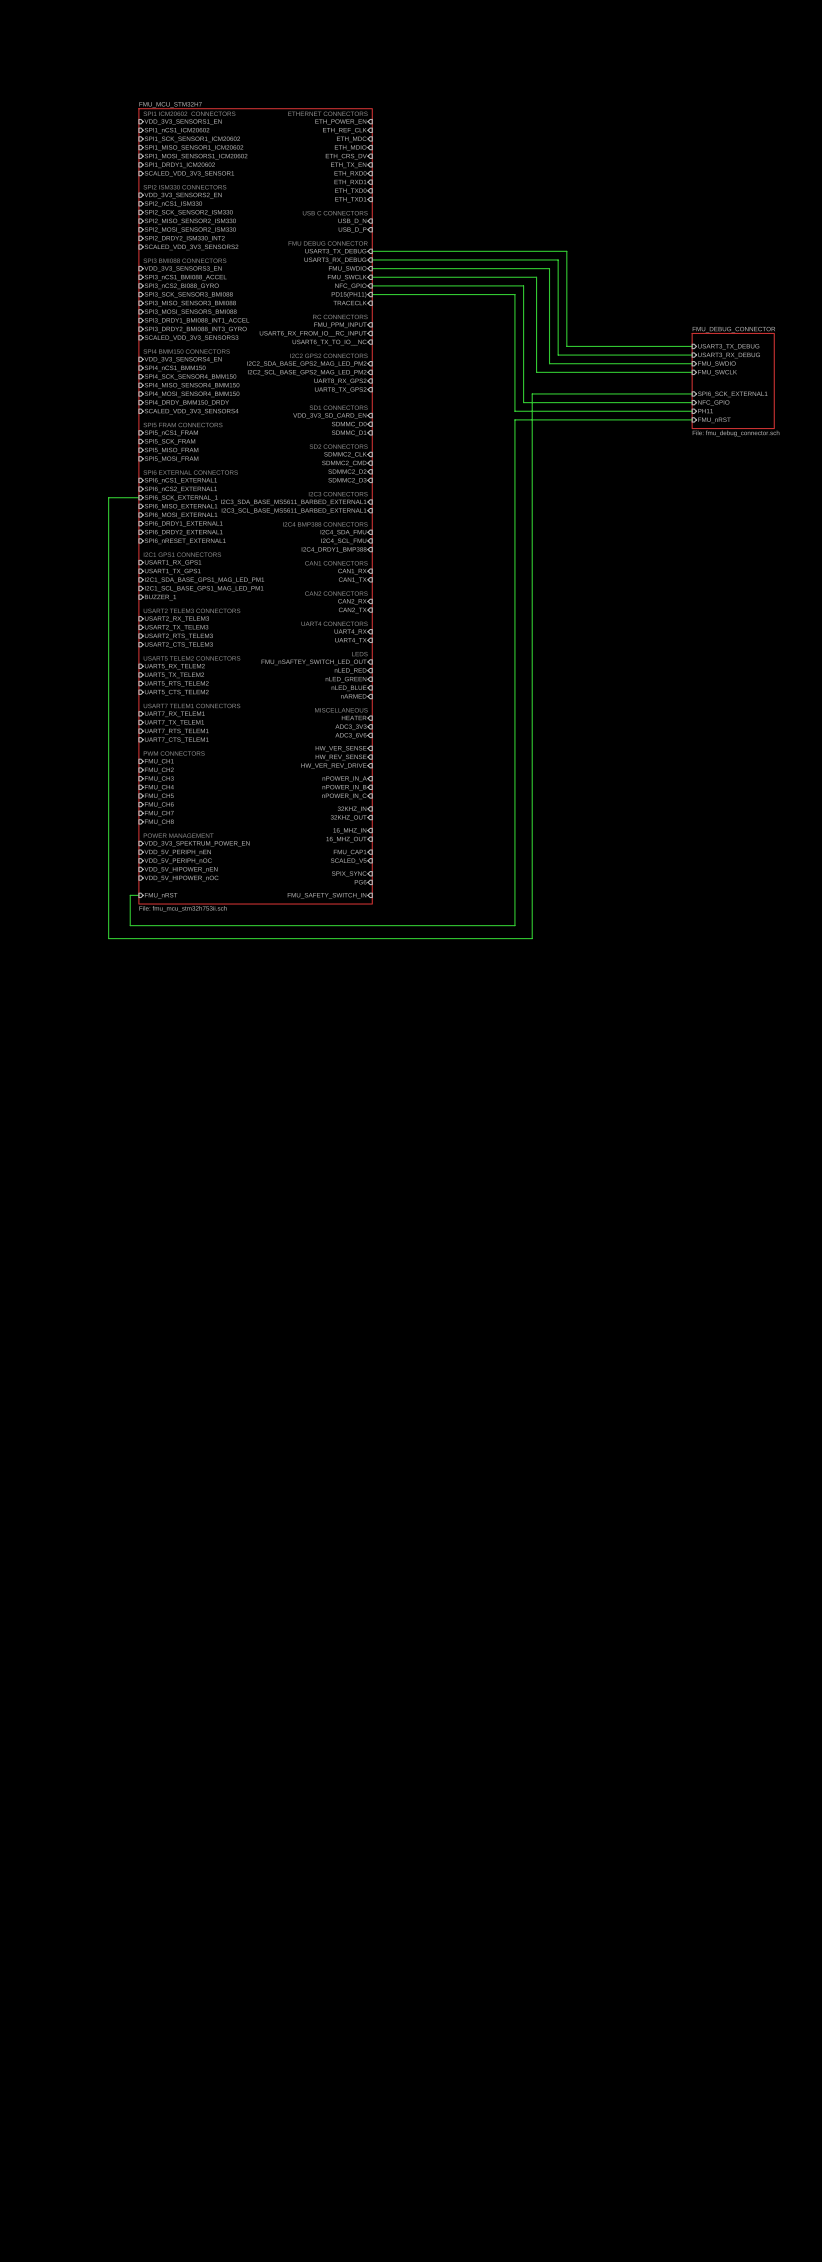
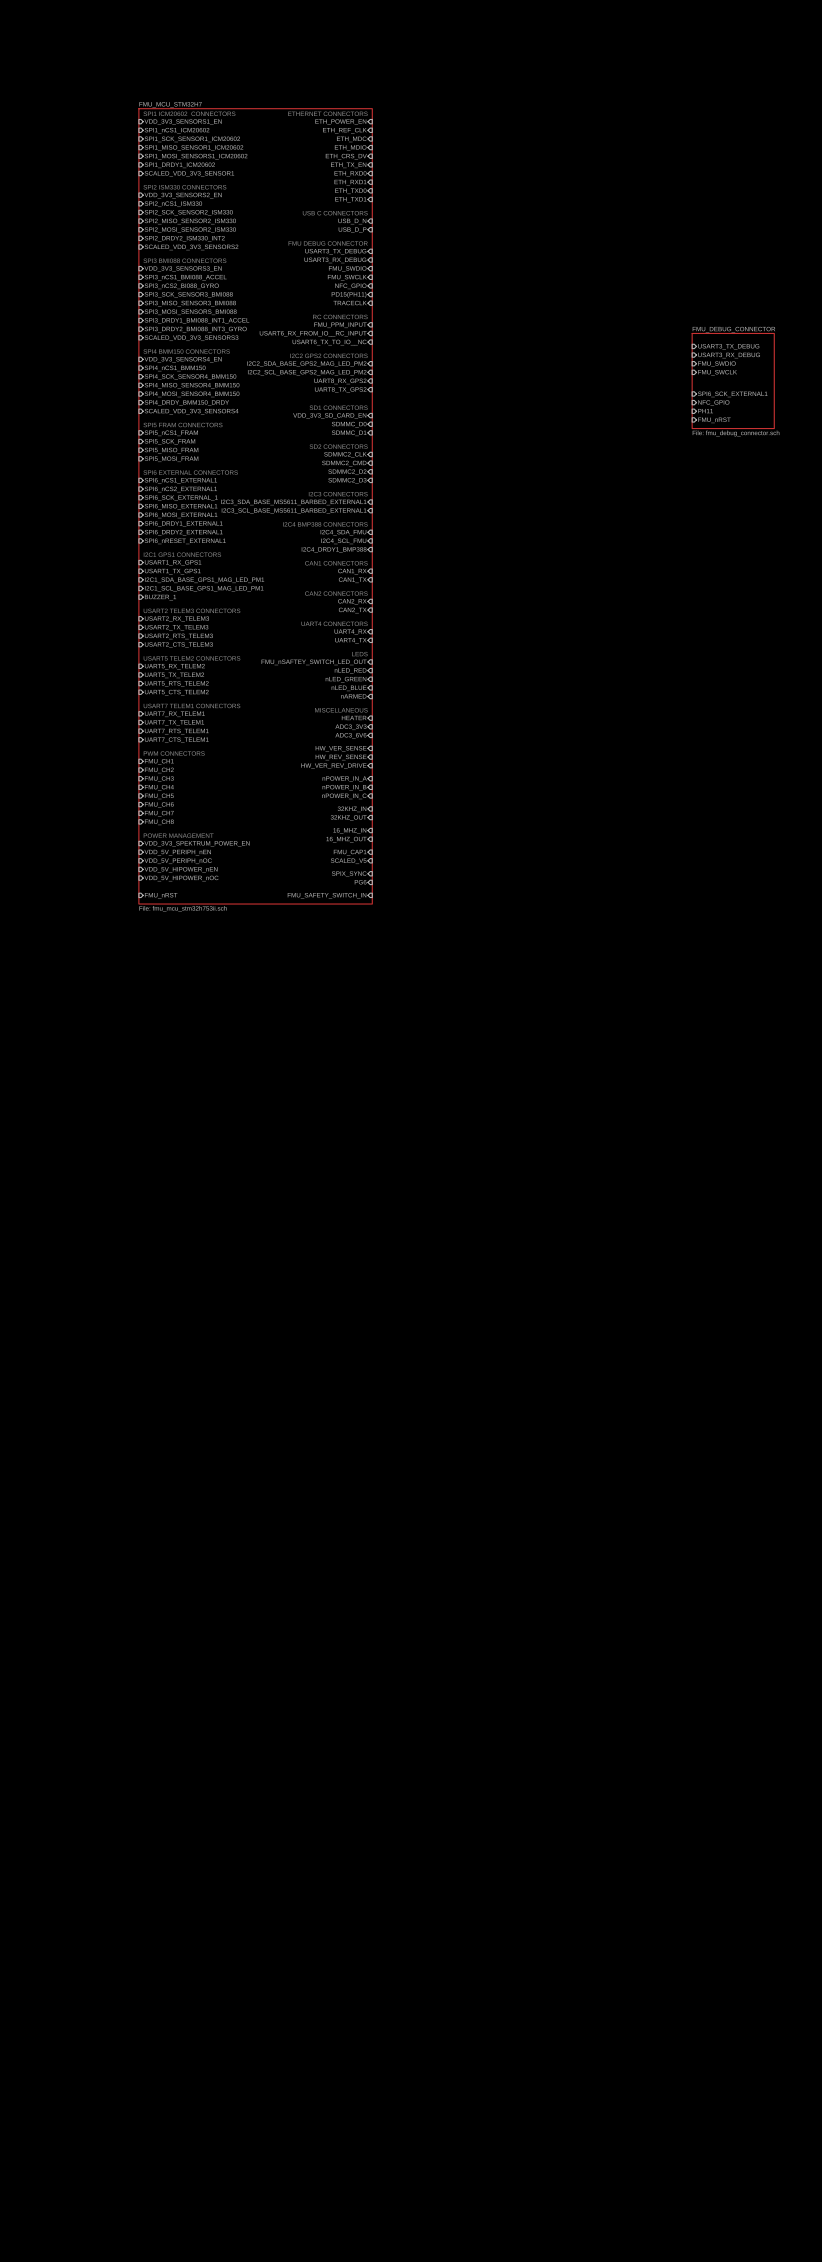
wire: (372, 251) (566, 251) (566, 346) (692, 346) -> none
wire: (372, 259) (558, 259) (558, 355) (692, 355) -> none
wire: (372, 268) (549, 268) (549, 363) (692, 363) -> none
wire: (372, 277) (536, 277) (536, 372) (692, 372) -> none
wire: (372, 285) (523, 285) (523, 402) (692, 402) -> none
wire: (372, 294) (514, 294) (514, 411) (692, 411) -> none
wire: (692, 393) (532, 393) (532, 938) (108, 938) (108, 497) (138, 497) -> none
wire: (692, 419) (514, 419) (514, 925) (130, 925) (130, 895) (138, 895) -> none

